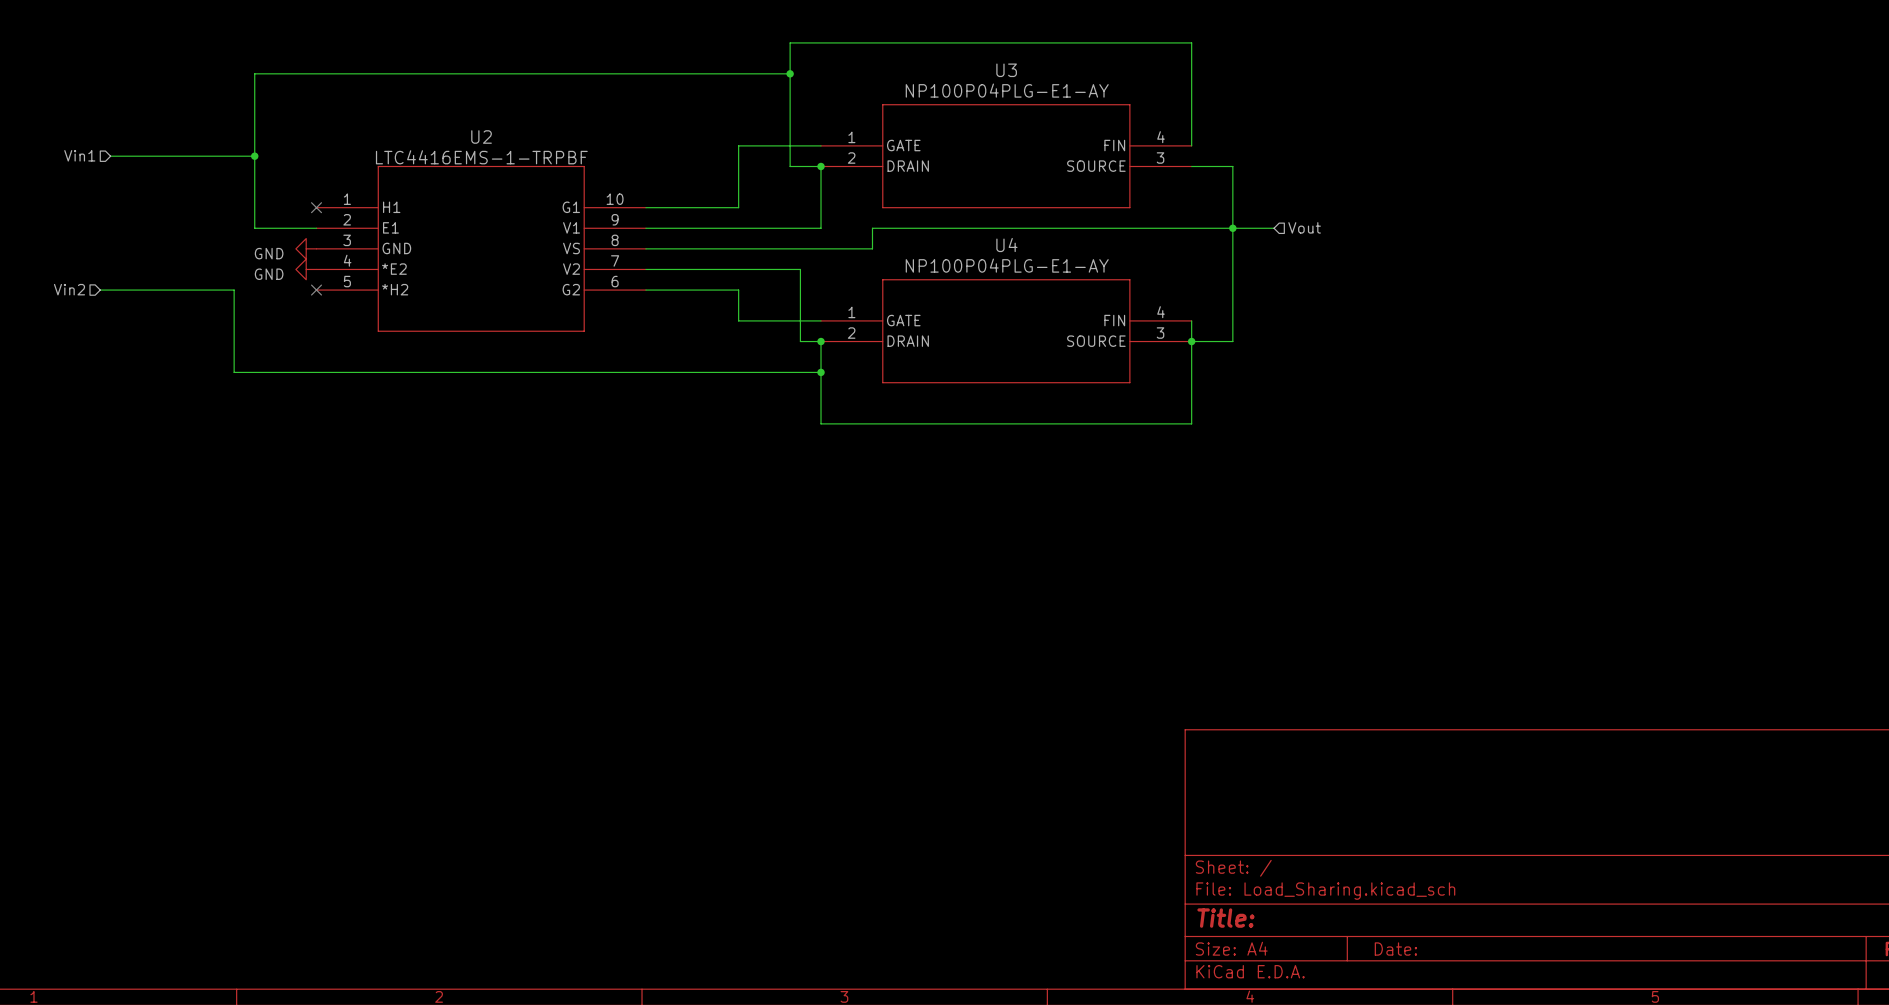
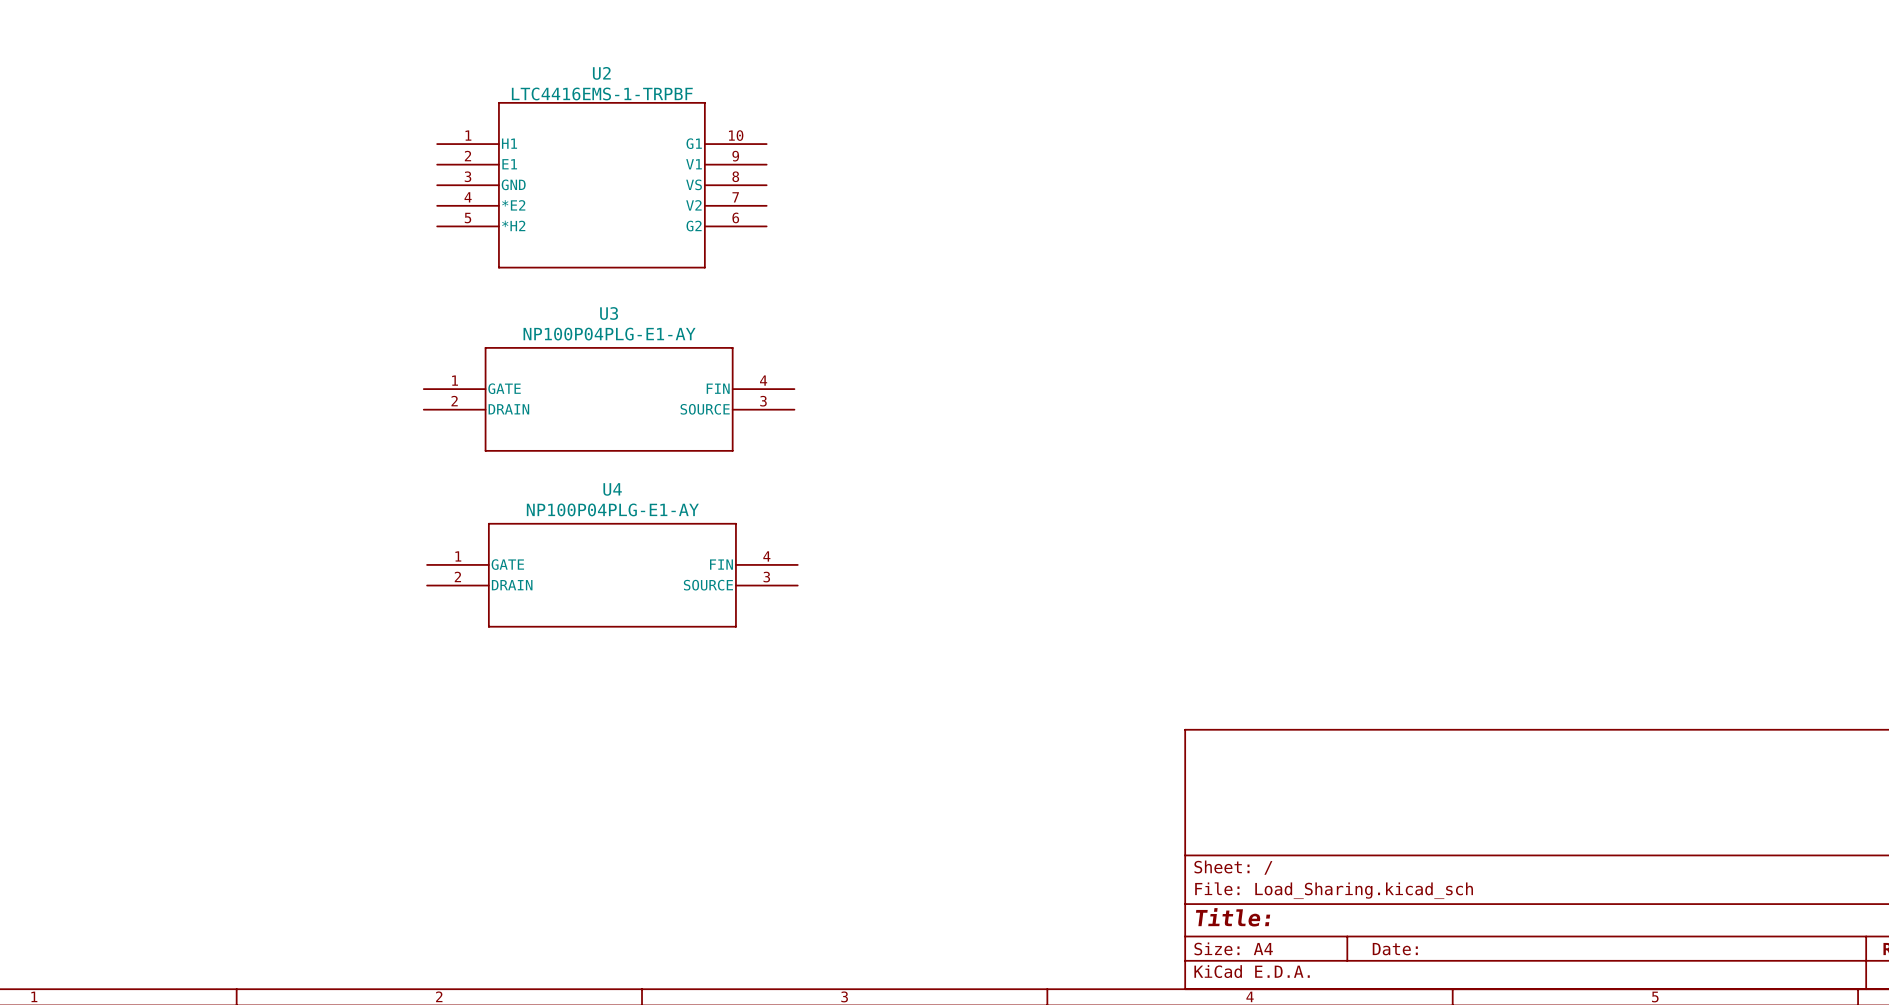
wire: (790, 73) (254, 73) (254, 228) (316, 228) -> none
junction: (790, 73) -> none
wire: (821, 145) (738, 145) (738, 207) (645, 207) -> none
wire: (1191, 145) (1191, 42) (790, 42) (790, 166) (821, 166) (821, 228) (645, 228) -> none
hierarchical label: Vin1 (79, 155) -> none
wire: (110, 156) (254, 156) -> none
junction: (254, 156) -> none
U3 position: (1006, 156) -> (609, 399)
junction: (821, 166) -> none
wire: (1191, 166) (1232, 166) (1232, 341) (1191, 341) -> none
no-connect mark: (316, 207) -> none
hierarchical label: Vout (1304, 227) -> none
junction: (1232, 228) -> none
wire: (1274, 228) (872, 228) (872, 248) (645, 248) -> none
power symbol: GND (306, 248) -> none
U2 position: (481, 248) -> (601, 185)
power symbol: GND (306, 269) -> none
wire: (645, 269) (800, 269) (800, 341) (821, 341) (821, 423) (1191, 423) (1191, 320) -> none
hierarchical label: Vin2 (69, 289) -> none
wire: (100, 290) (234, 290) (234, 372) (821, 372) -> none
no-connect mark: (316, 290) -> none
wire: (645, 290) (738, 290) (738, 320) (821, 320) -> none
U4 position: (1006, 331) -> (612, 575)
junction: (821, 341) -> none
junction: (1191, 341) -> none
junction: (821, 372) -> none

